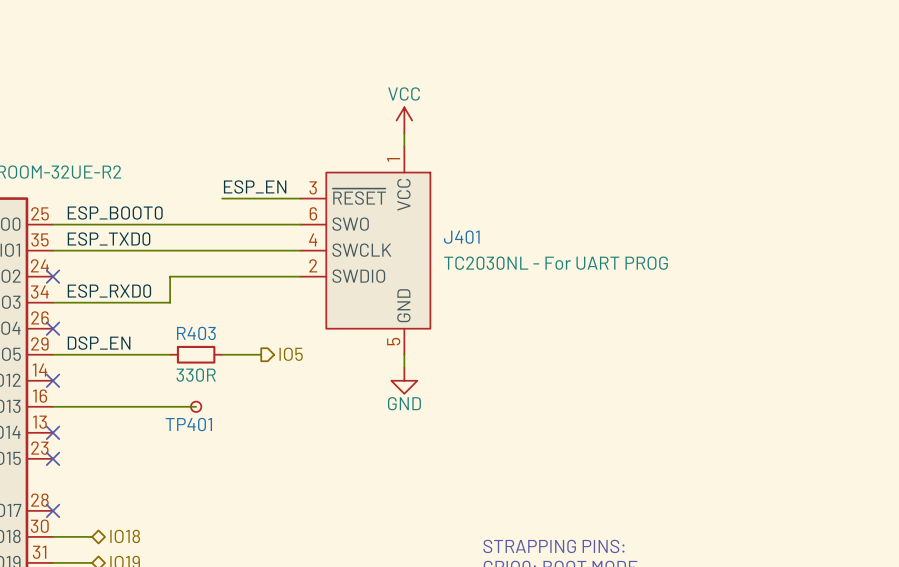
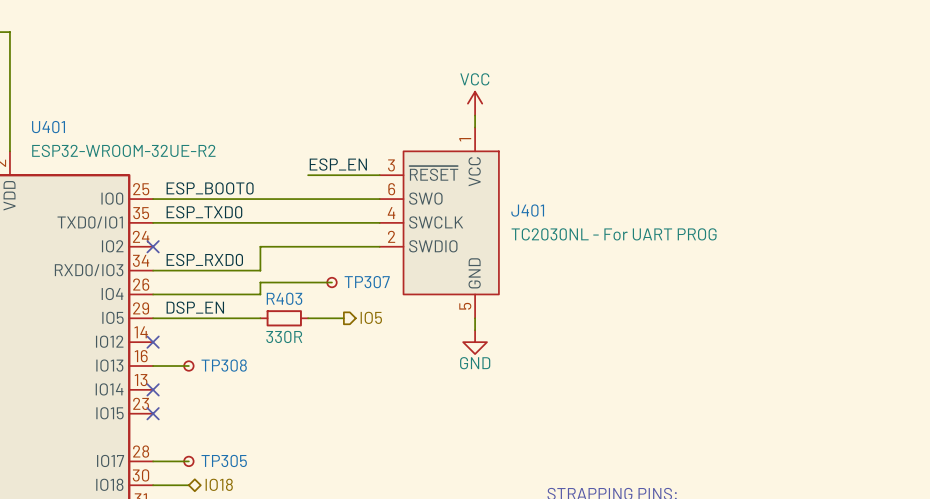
wire: none -> (331, 282) (260, 282) (260, 294) (153, 294)
TP307: none -> (331, 282)
no-connect mark: (52, 328) -> none
wire: (92, 406) (196, 406) -> none
TP308: none -> (188, 366)
TP401: (196, 406) -> none
wire: none -> (153, 461) (188, 461)
no-connect mark: (52, 510) -> none
TP305: none -> (188, 461)

